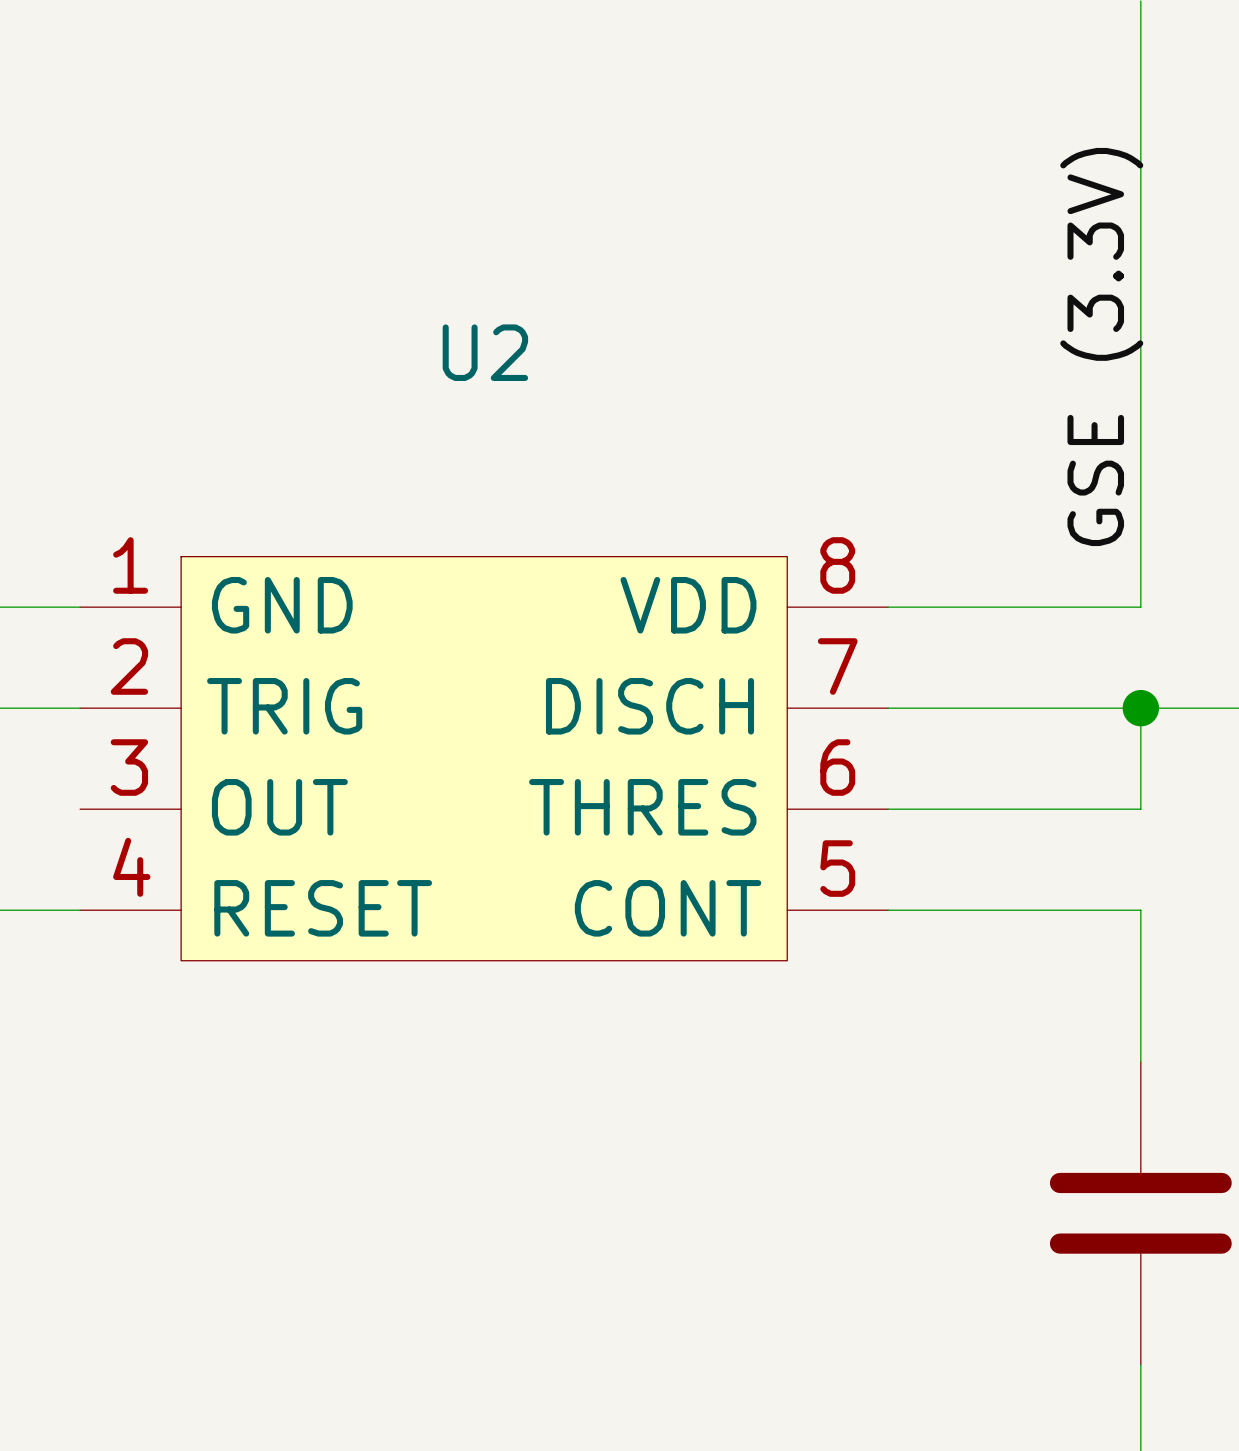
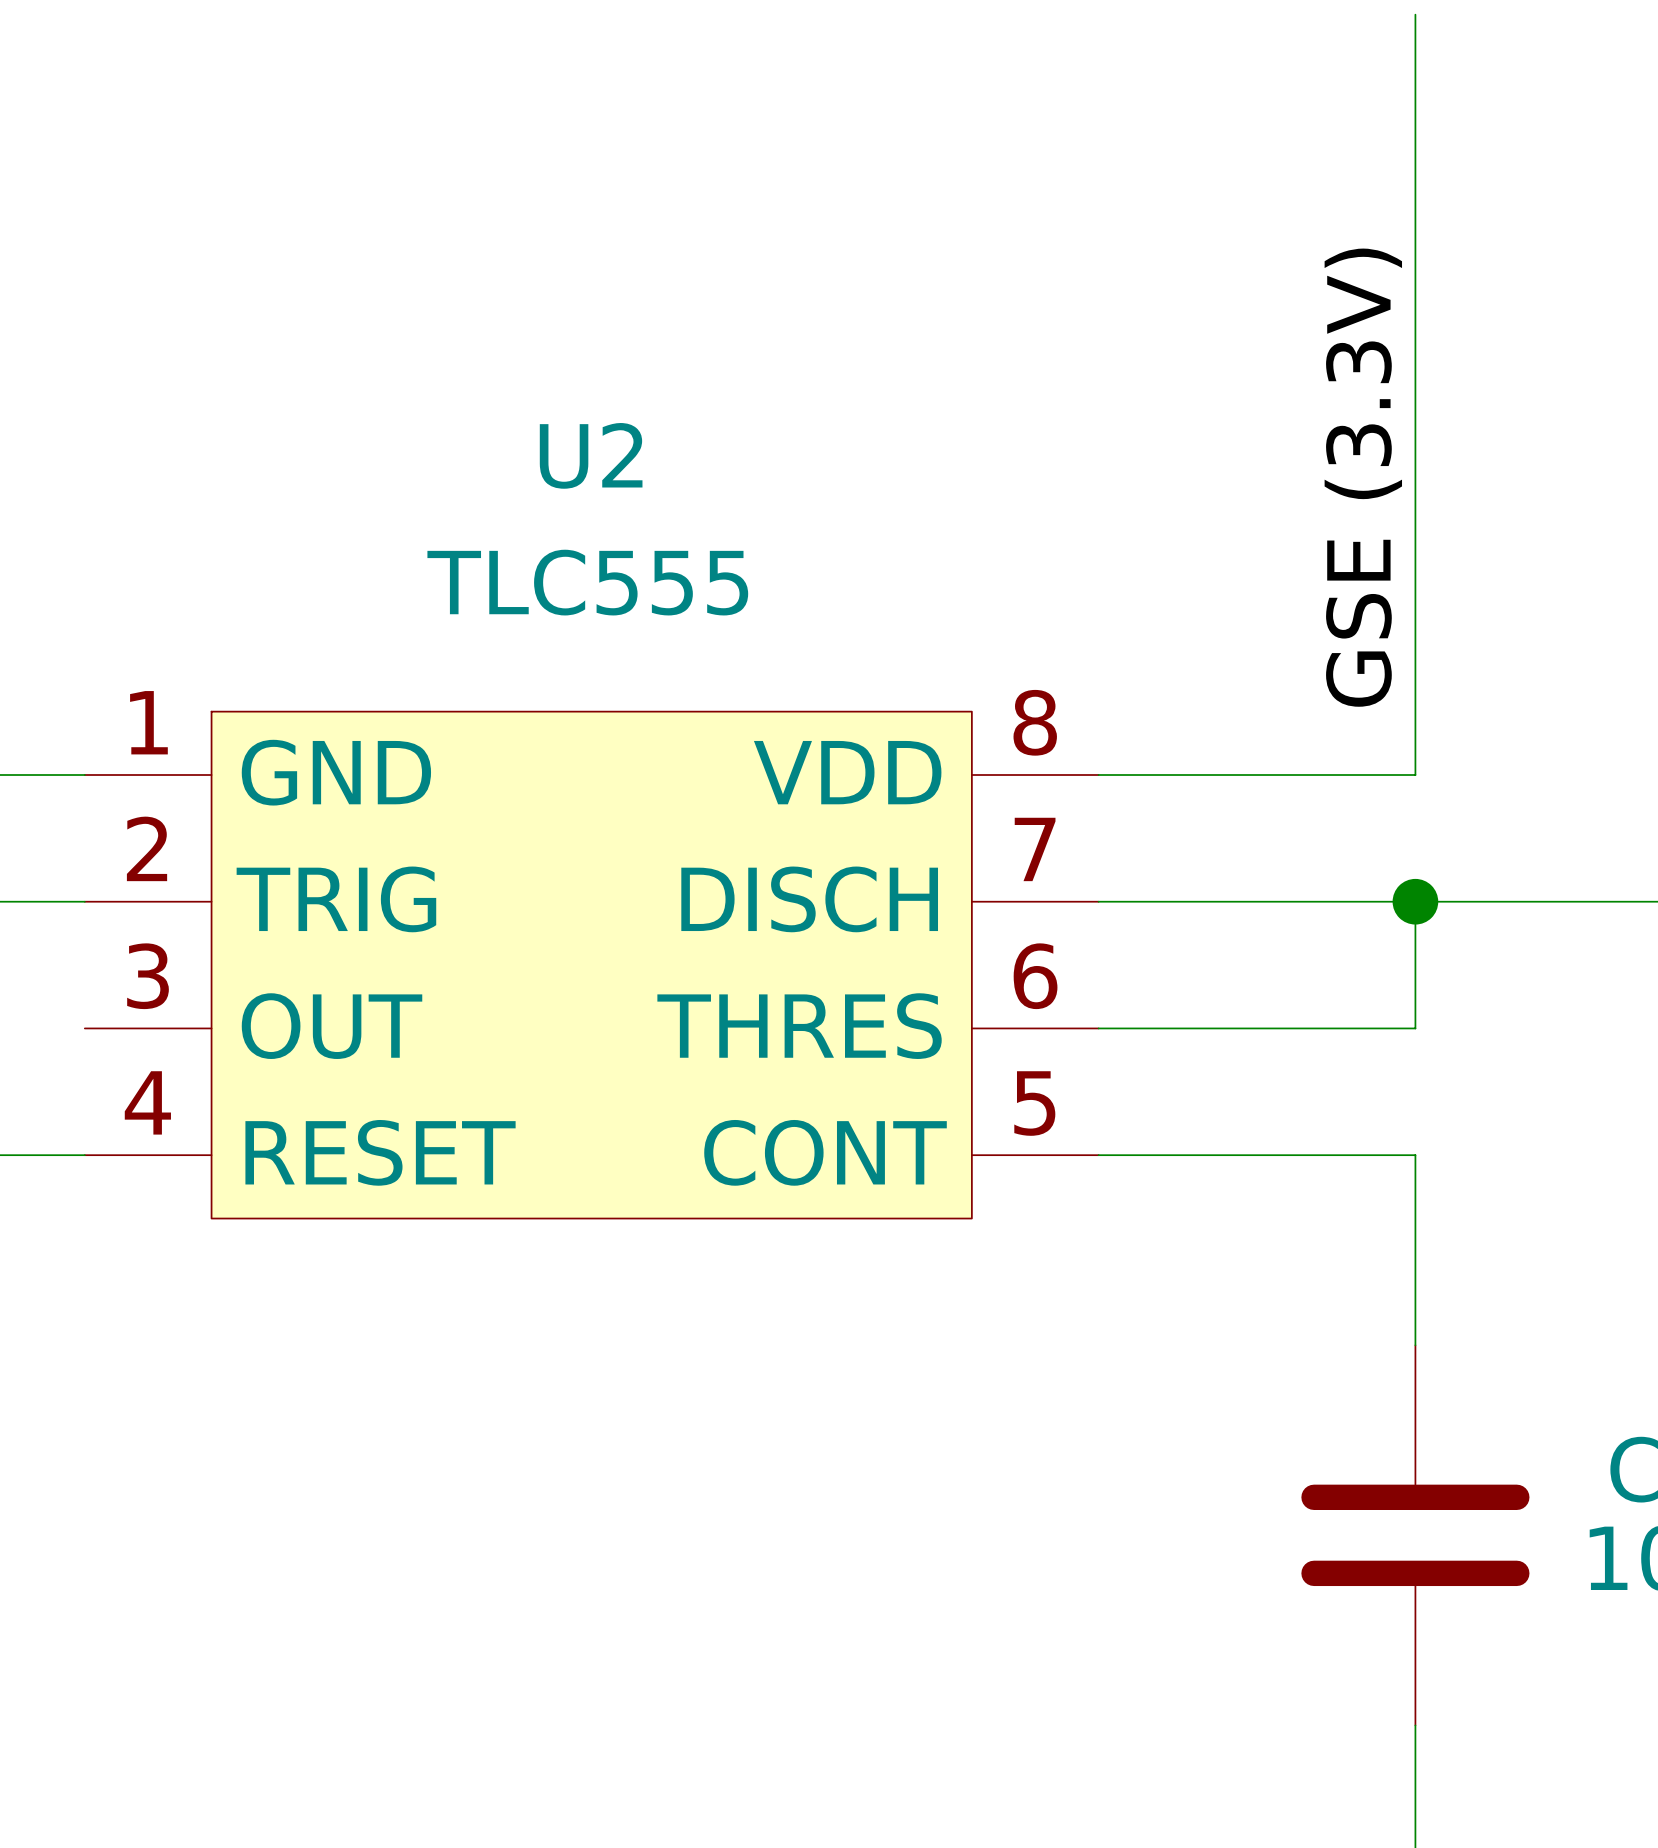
U2 value: none -> TLC555 (587, 582)

